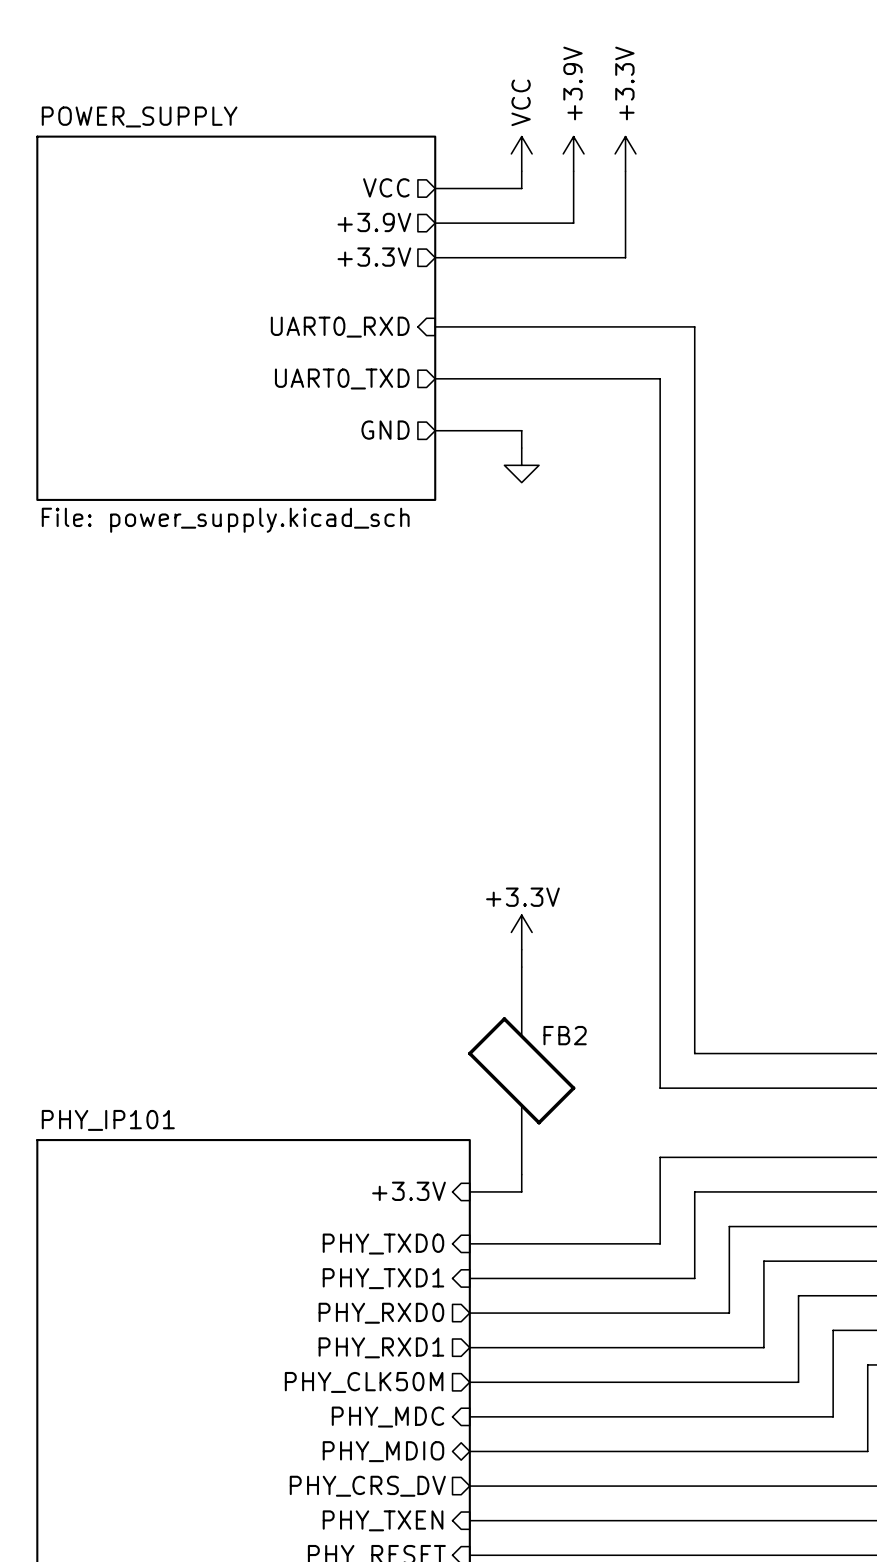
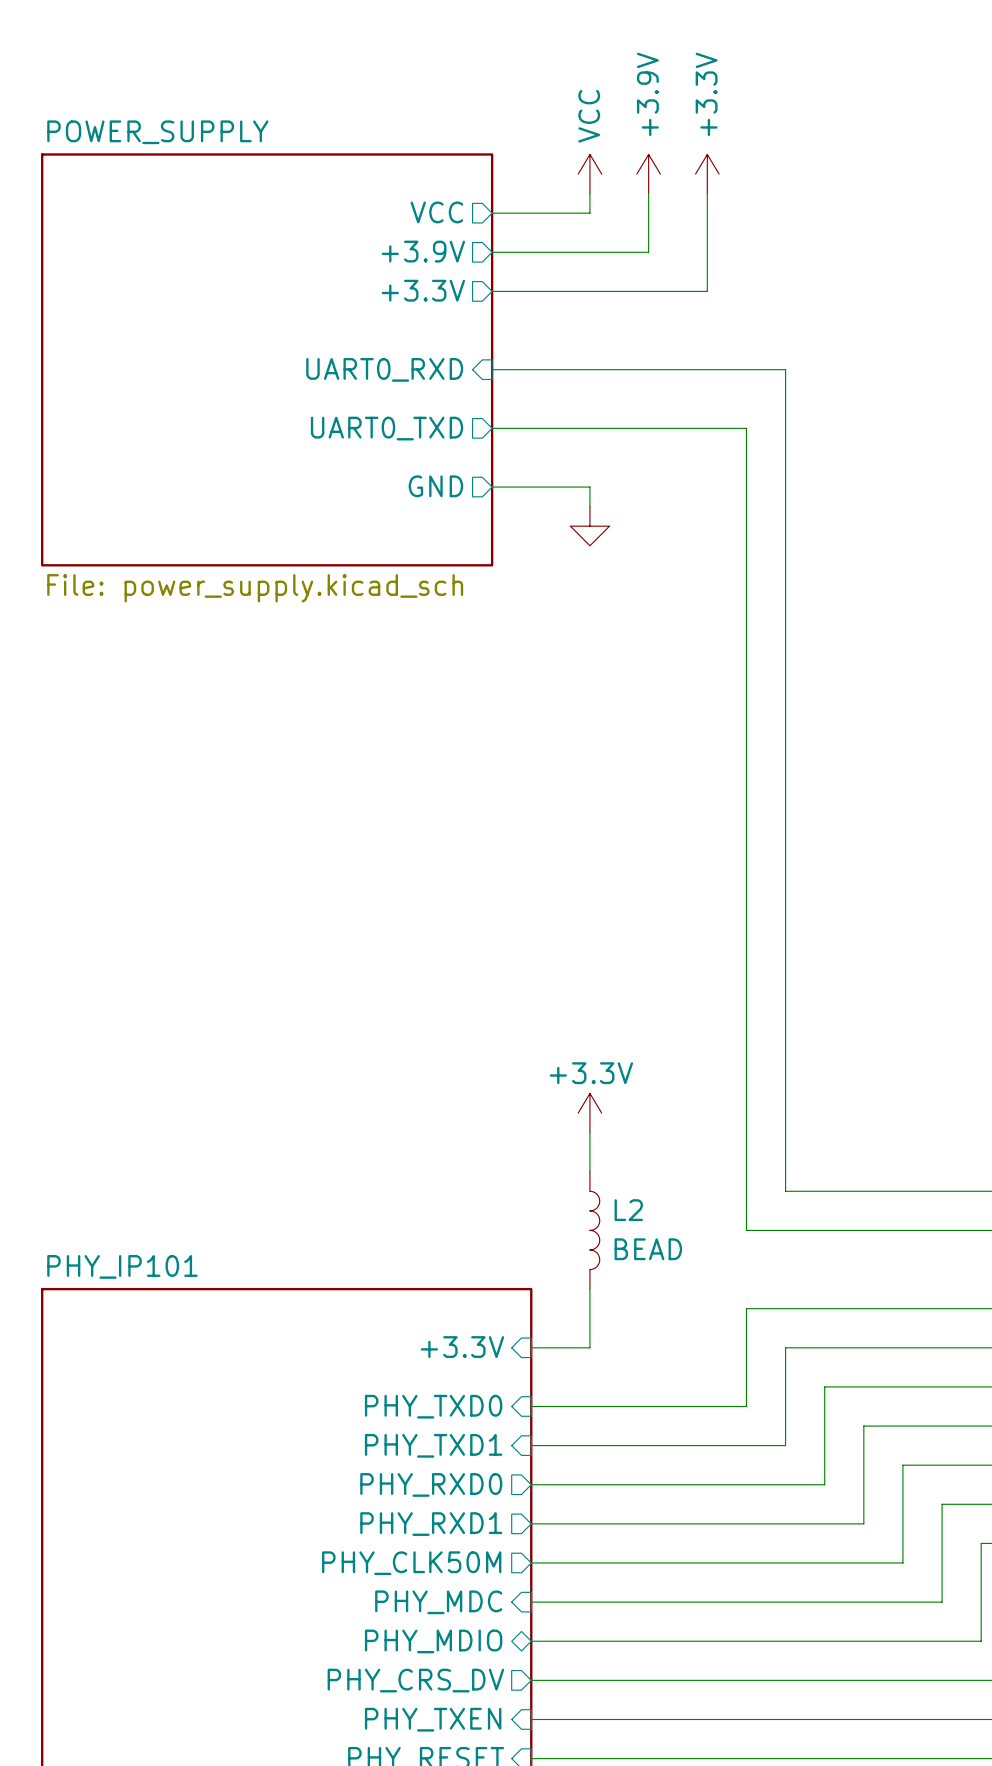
power symbol position: +3.3V (521, 932) -> +3.3V (589, 1113)
wire: (521, 949) (521, 967) -> none
FB2: (521, 1070) -> none
L2: none -> BEAD (594, 1230)

